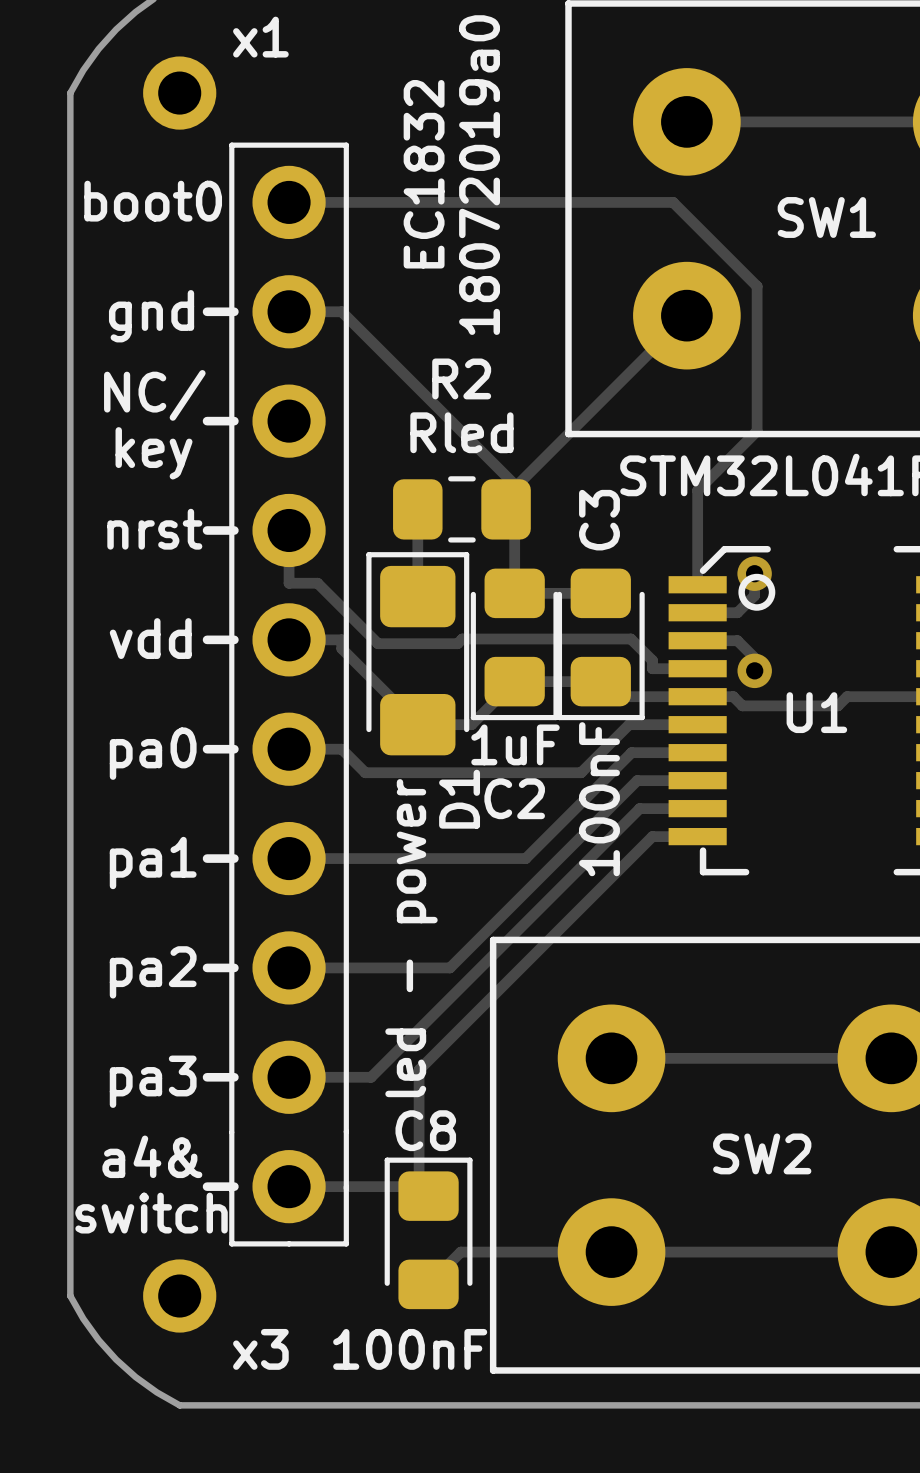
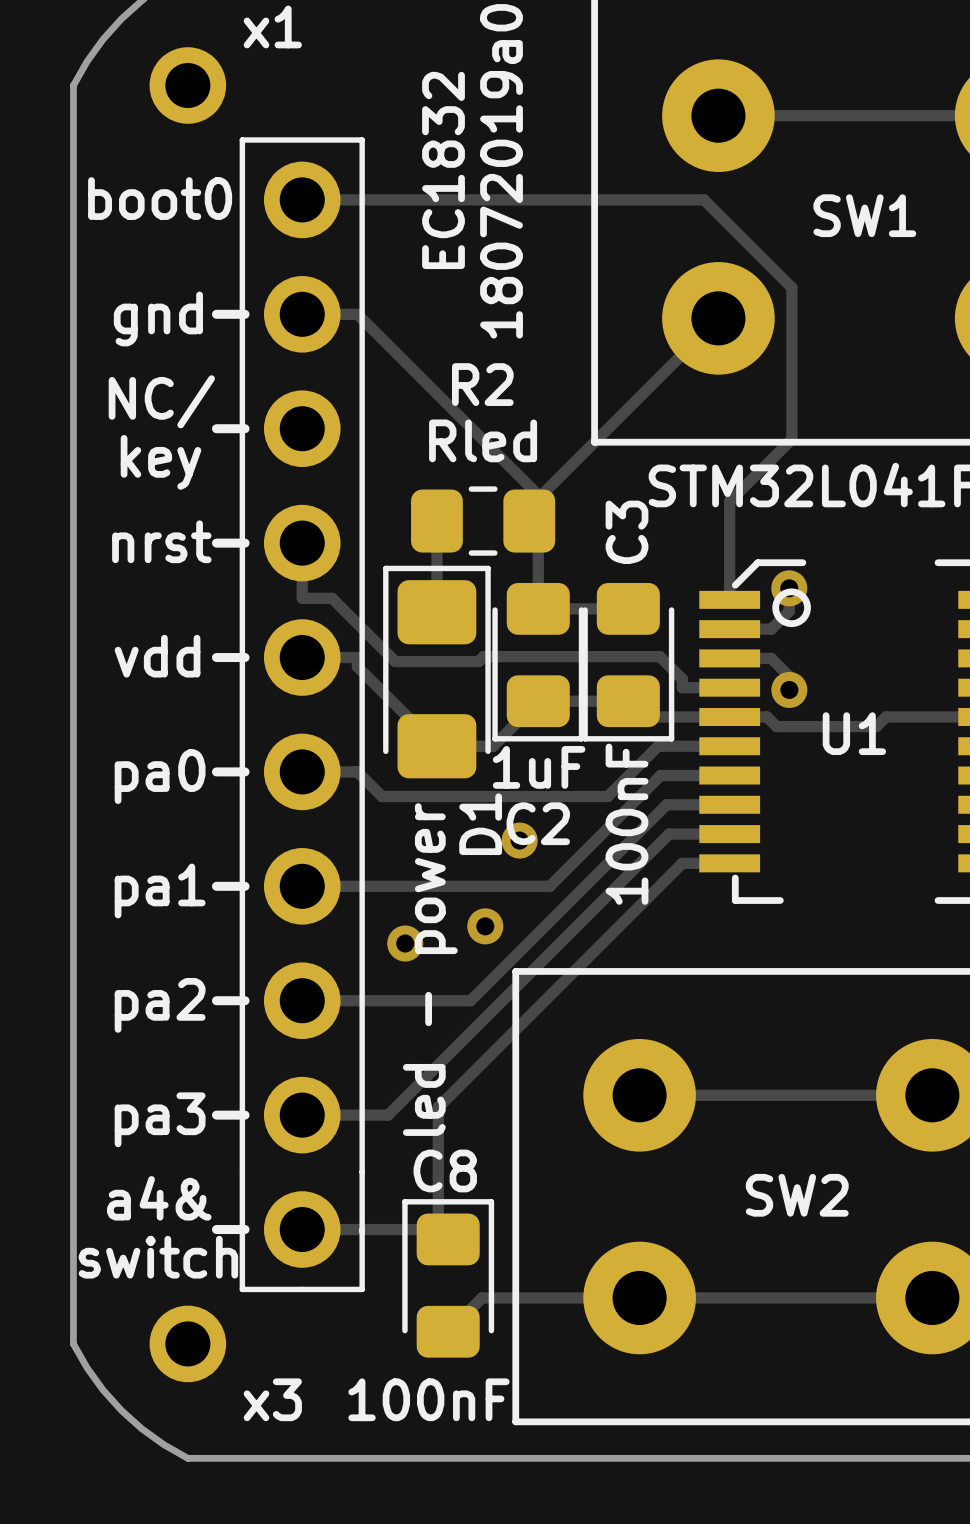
via: none -> (519, 840)
via: none -> (485, 926)
via: none -> (405, 943)

